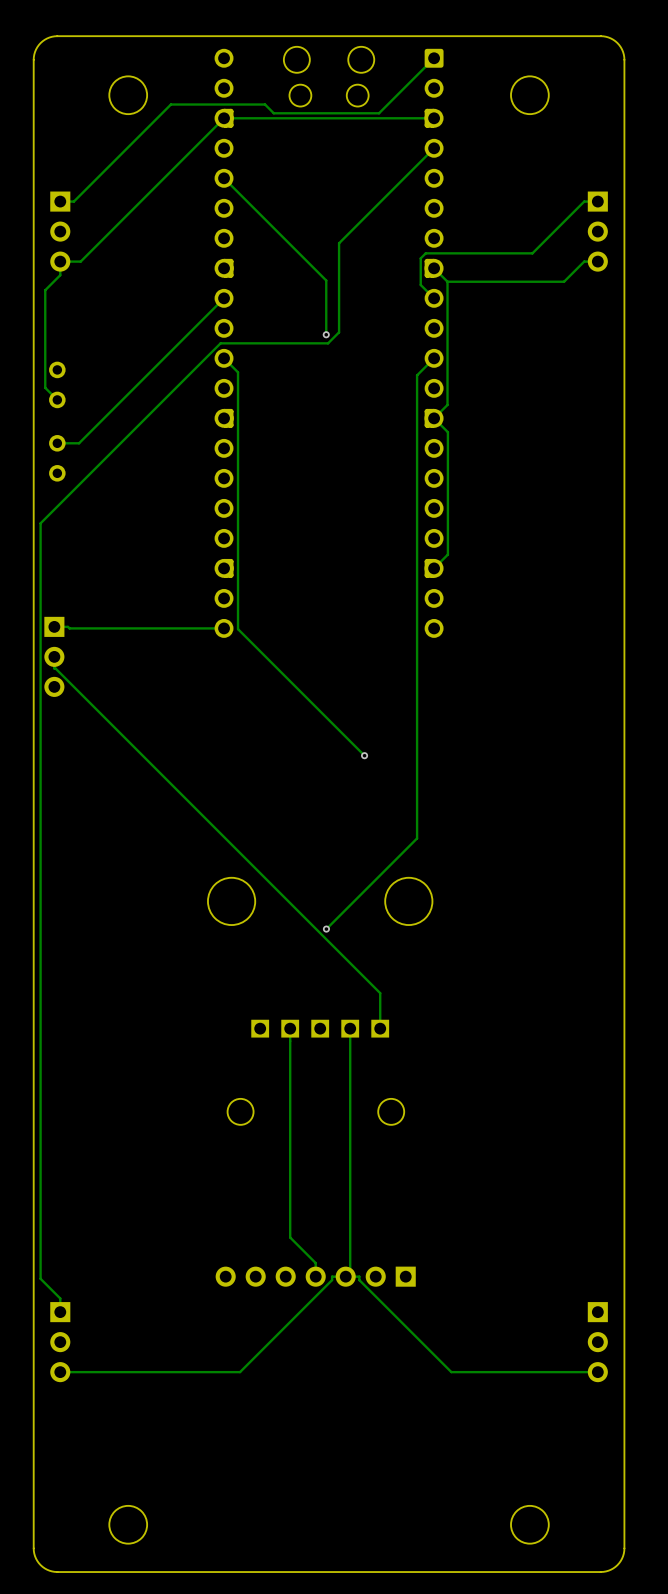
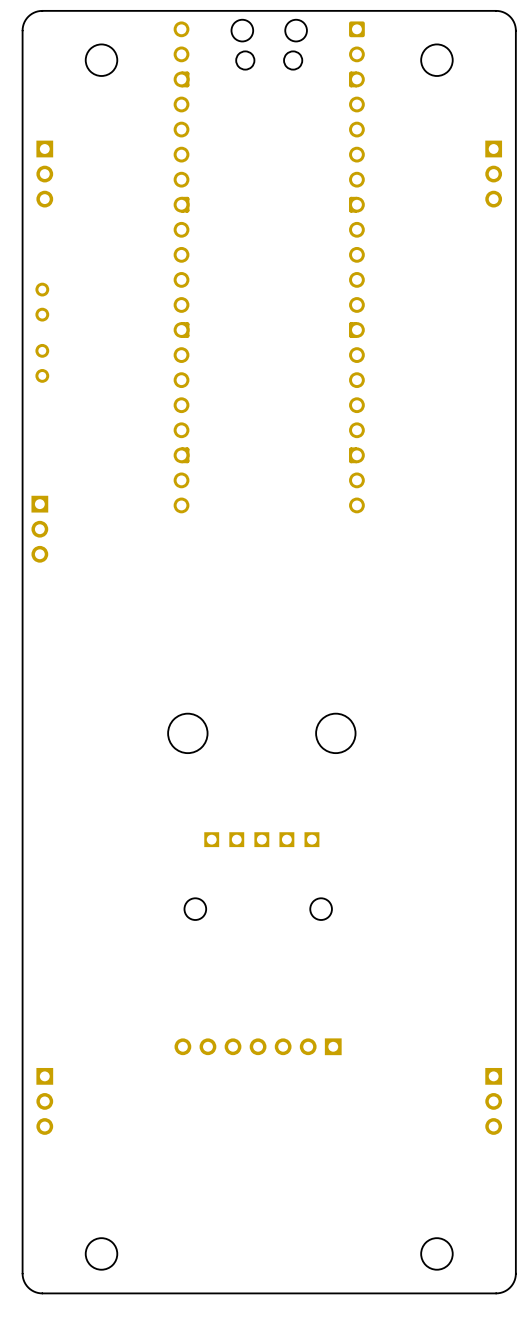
track: (434, 58) (379, 113) (273, 113) (265, 104) (170, 104) (73, 201) (60, 201) -> none
track: (434, 118) (224, 118) (80, 261) (60, 261) (60, 275) (45, 290) (45, 387) (57, 399) -> none
track: (434, 148) (339, 243) (339, 332) (328, 343) (220, 343) (40, 523) (40, 1278) (60, 1298) (60, 1312) -> none
track: (224, 178) (326, 280) (326, 334) -> none
track: (597, 201) (584, 201) (532, 253) (425, 253) (420, 258) (420, 284) (434, 298) -> none
track: (597, 261) (584, 261) (564, 281) (447, 281) -> none
track: (434, 268) (447, 281) -> none
track: (447, 281) (447, 404) (434, 418) (447, 432) (447, 554) (434, 568) -> none
track: (224, 298) (79, 443) (57, 443) -> none
via: (326, 334) -> none
track: (224, 358) (238, 372) (238, 629) (364, 755) -> none
track: (434, 358) (417, 375) (417, 838) (326, 929) -> none
track: (54, 626) (224, 628) -> none
track: (54, 656) (54, 668) (380, 993) (380, 1028) -> none
via: (364, 755) -> none
via: (326, 929) -> none
track: (290, 1028) (290, 1237) (315, 1263) (315, 1276) -> none
track: (350, 1028) (350, 1276) -> none
track: (597, 1372) (451, 1372) (359, 1280) (359, 1276) (332, 1276) (332, 1280) (240, 1372) (60, 1372) -> none

